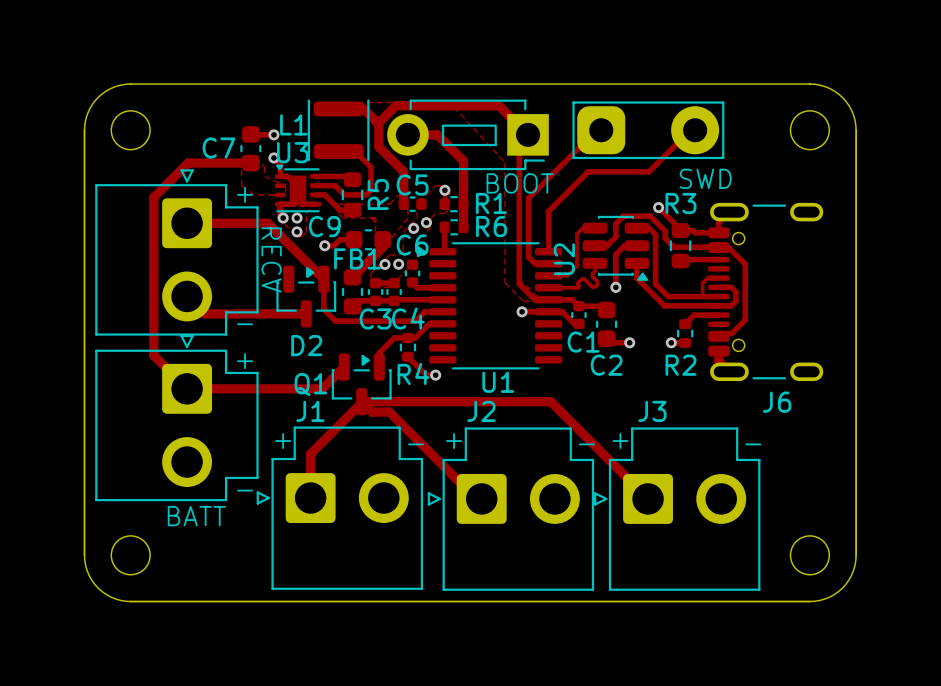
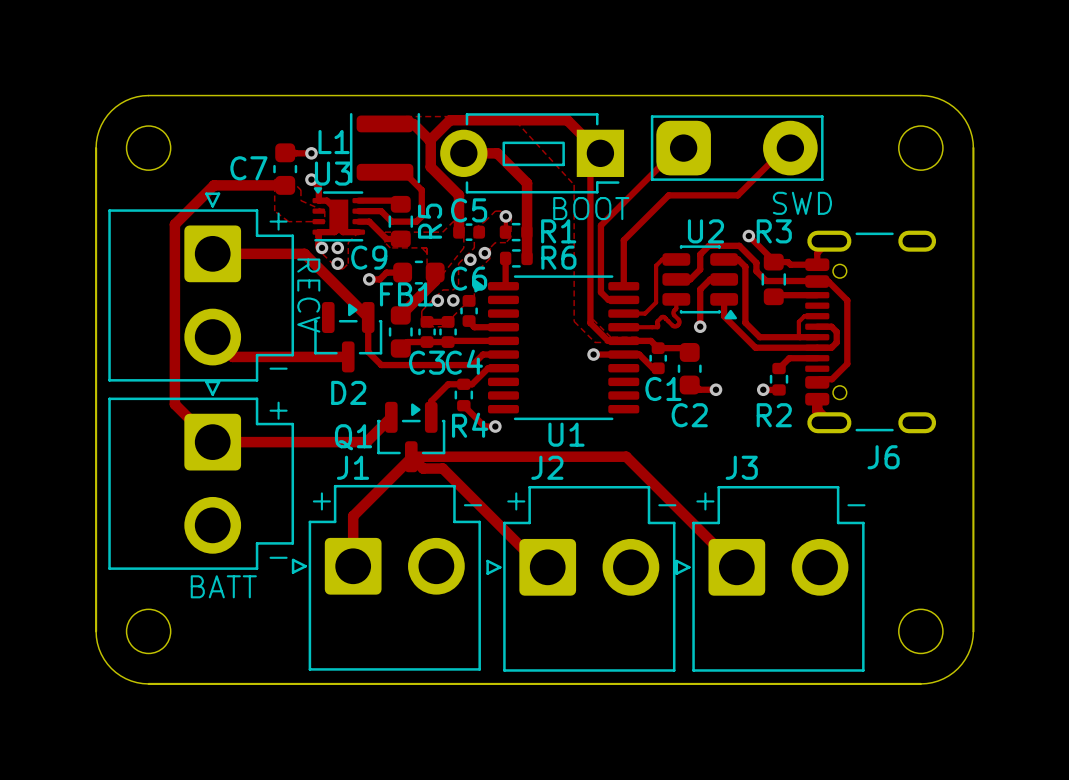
U2 name rotation: 0° (564, 259) -> 90° clockwise (705, 231)
U2 name position: U2 (564, 259) -> U2 (705, 231)

